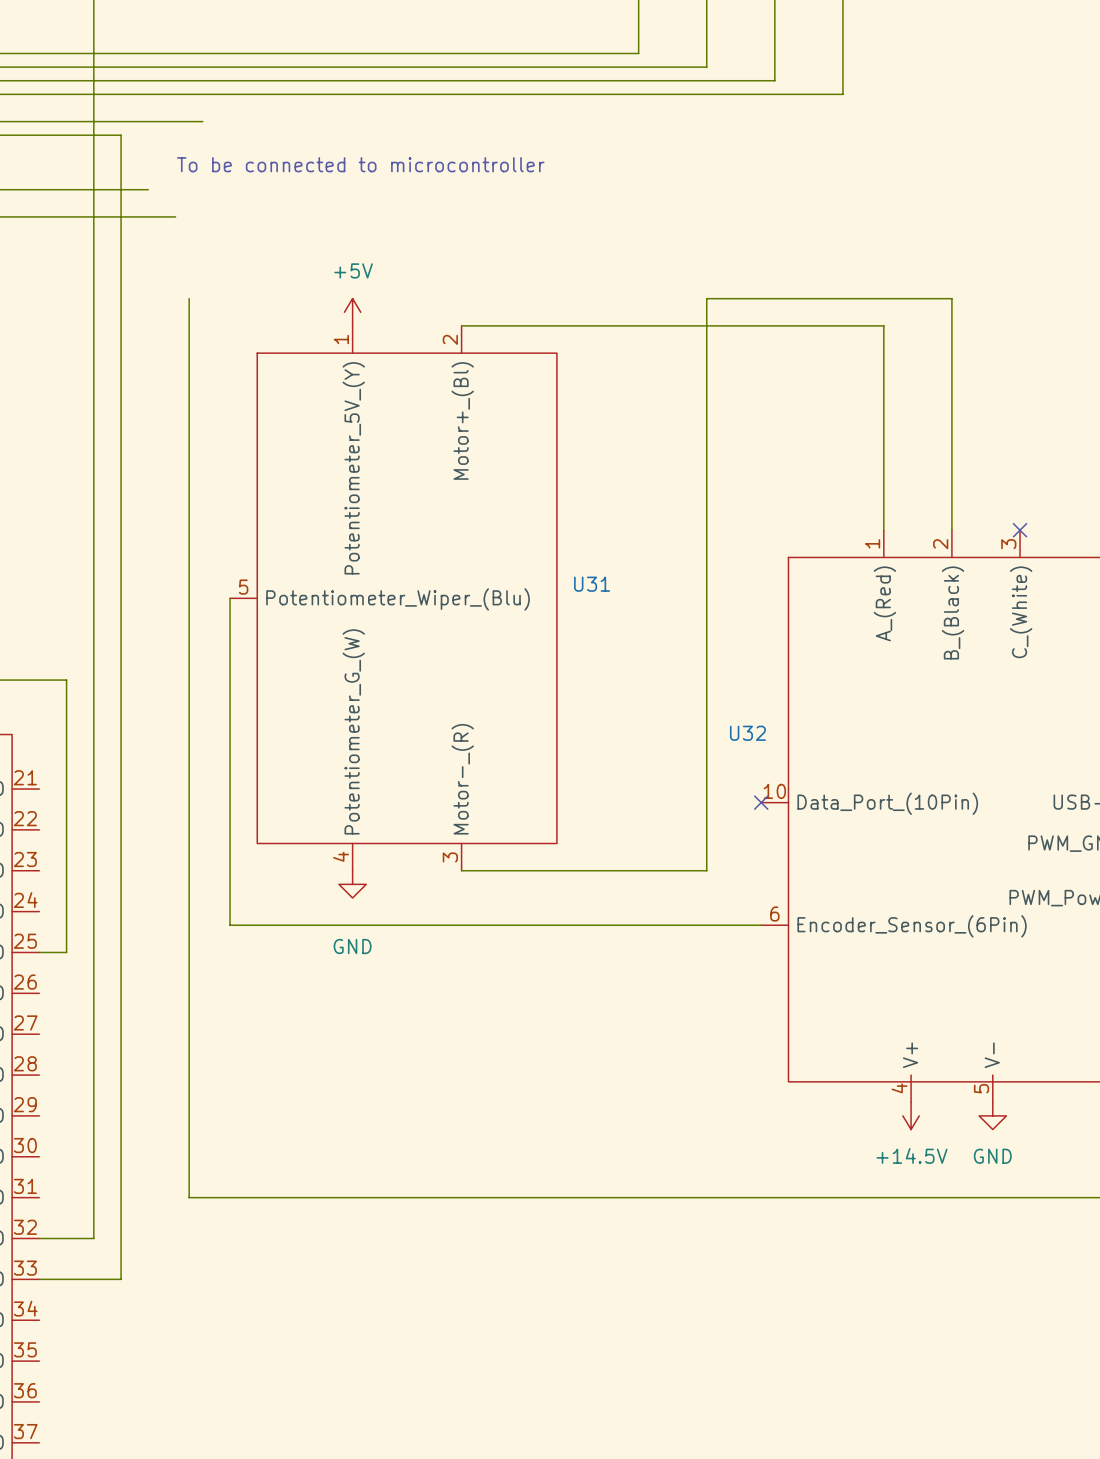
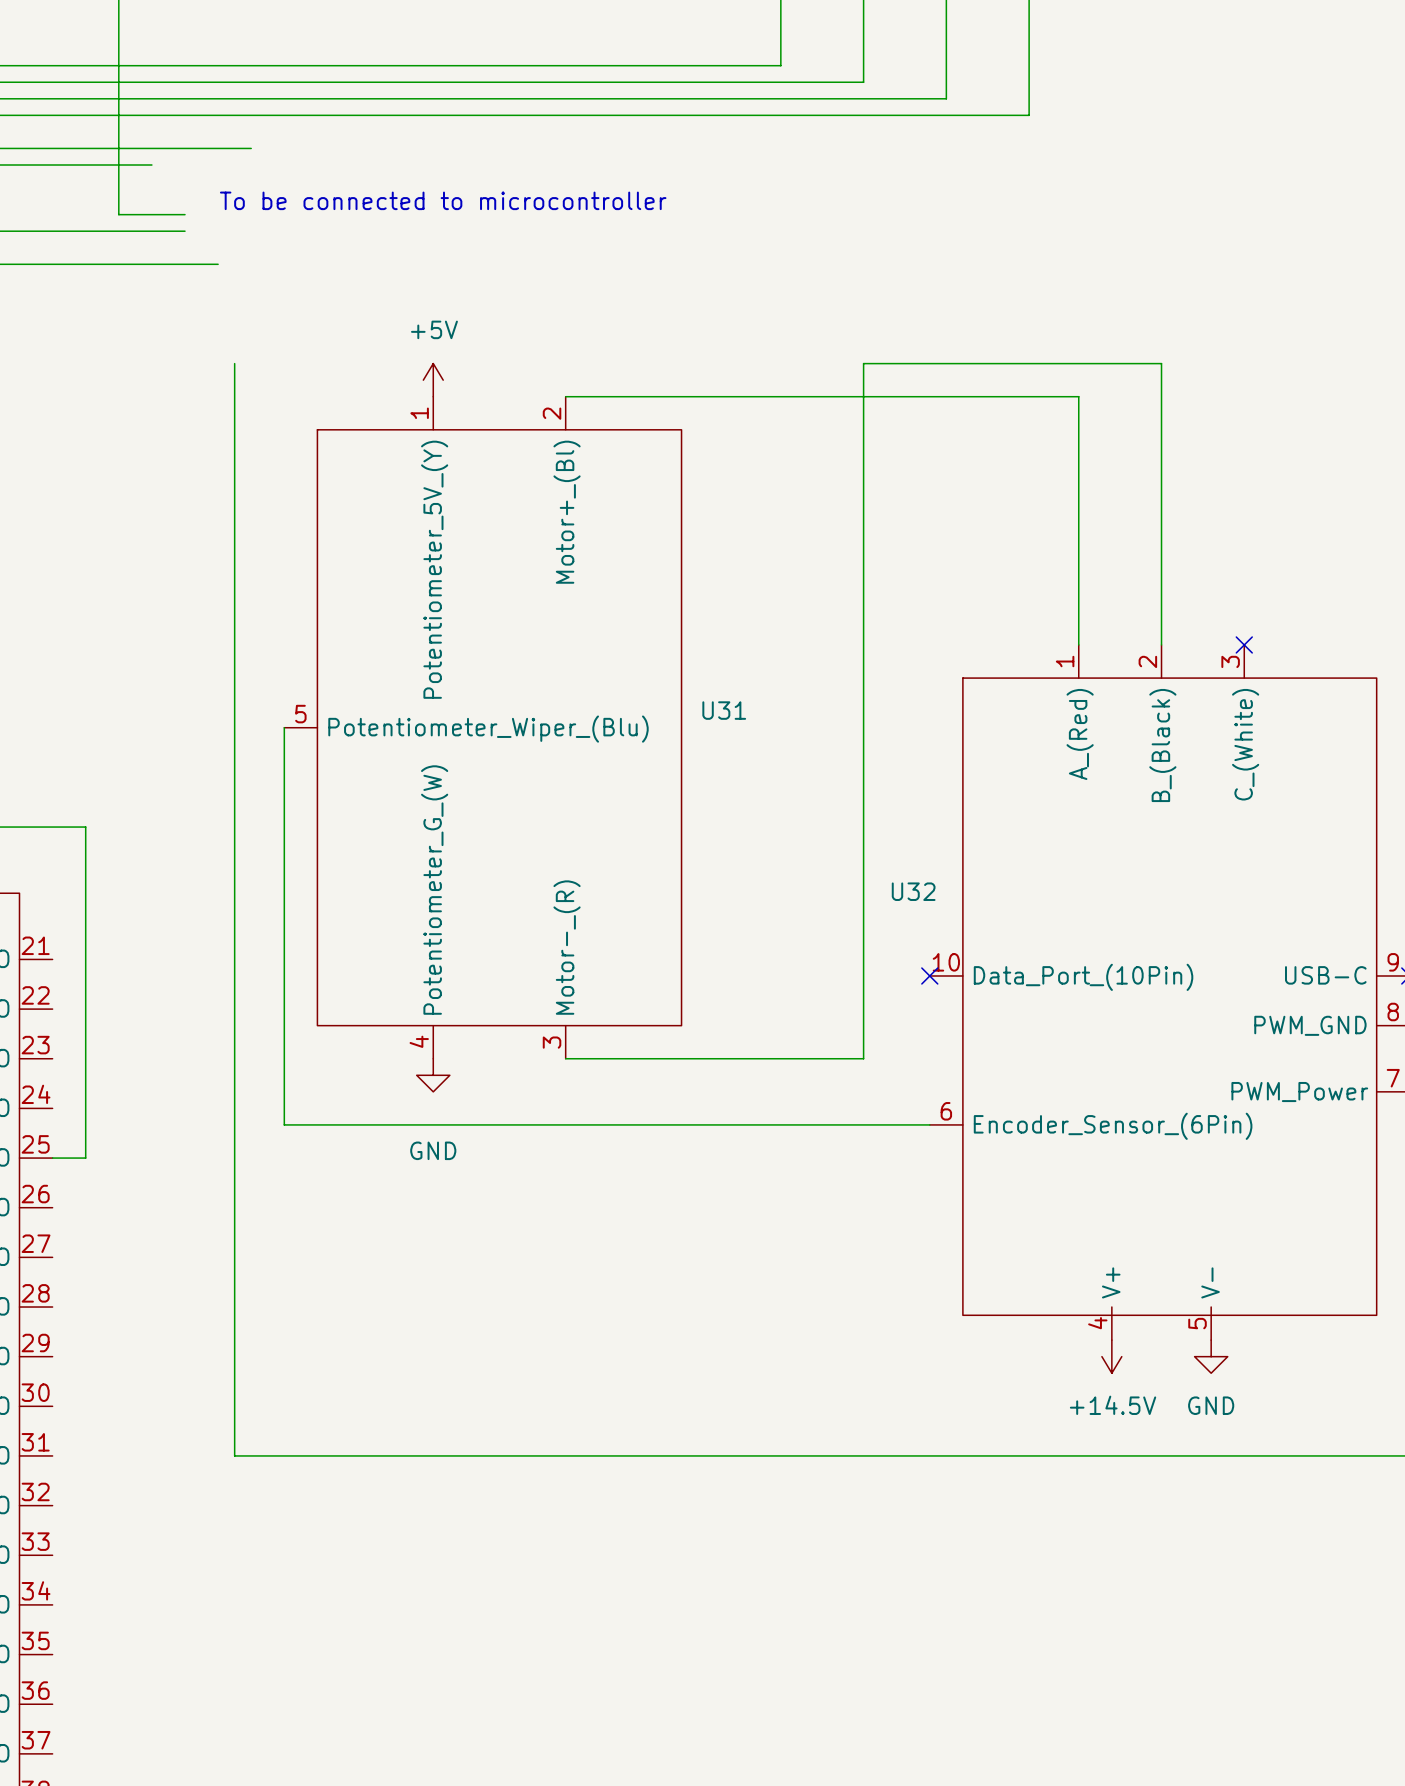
wire: (121, 135) (121, 1279) (39, 1279) -> none
wire: (93, 176) (93, 1238) (39, 1238) -> (118, 214) (185, 214)

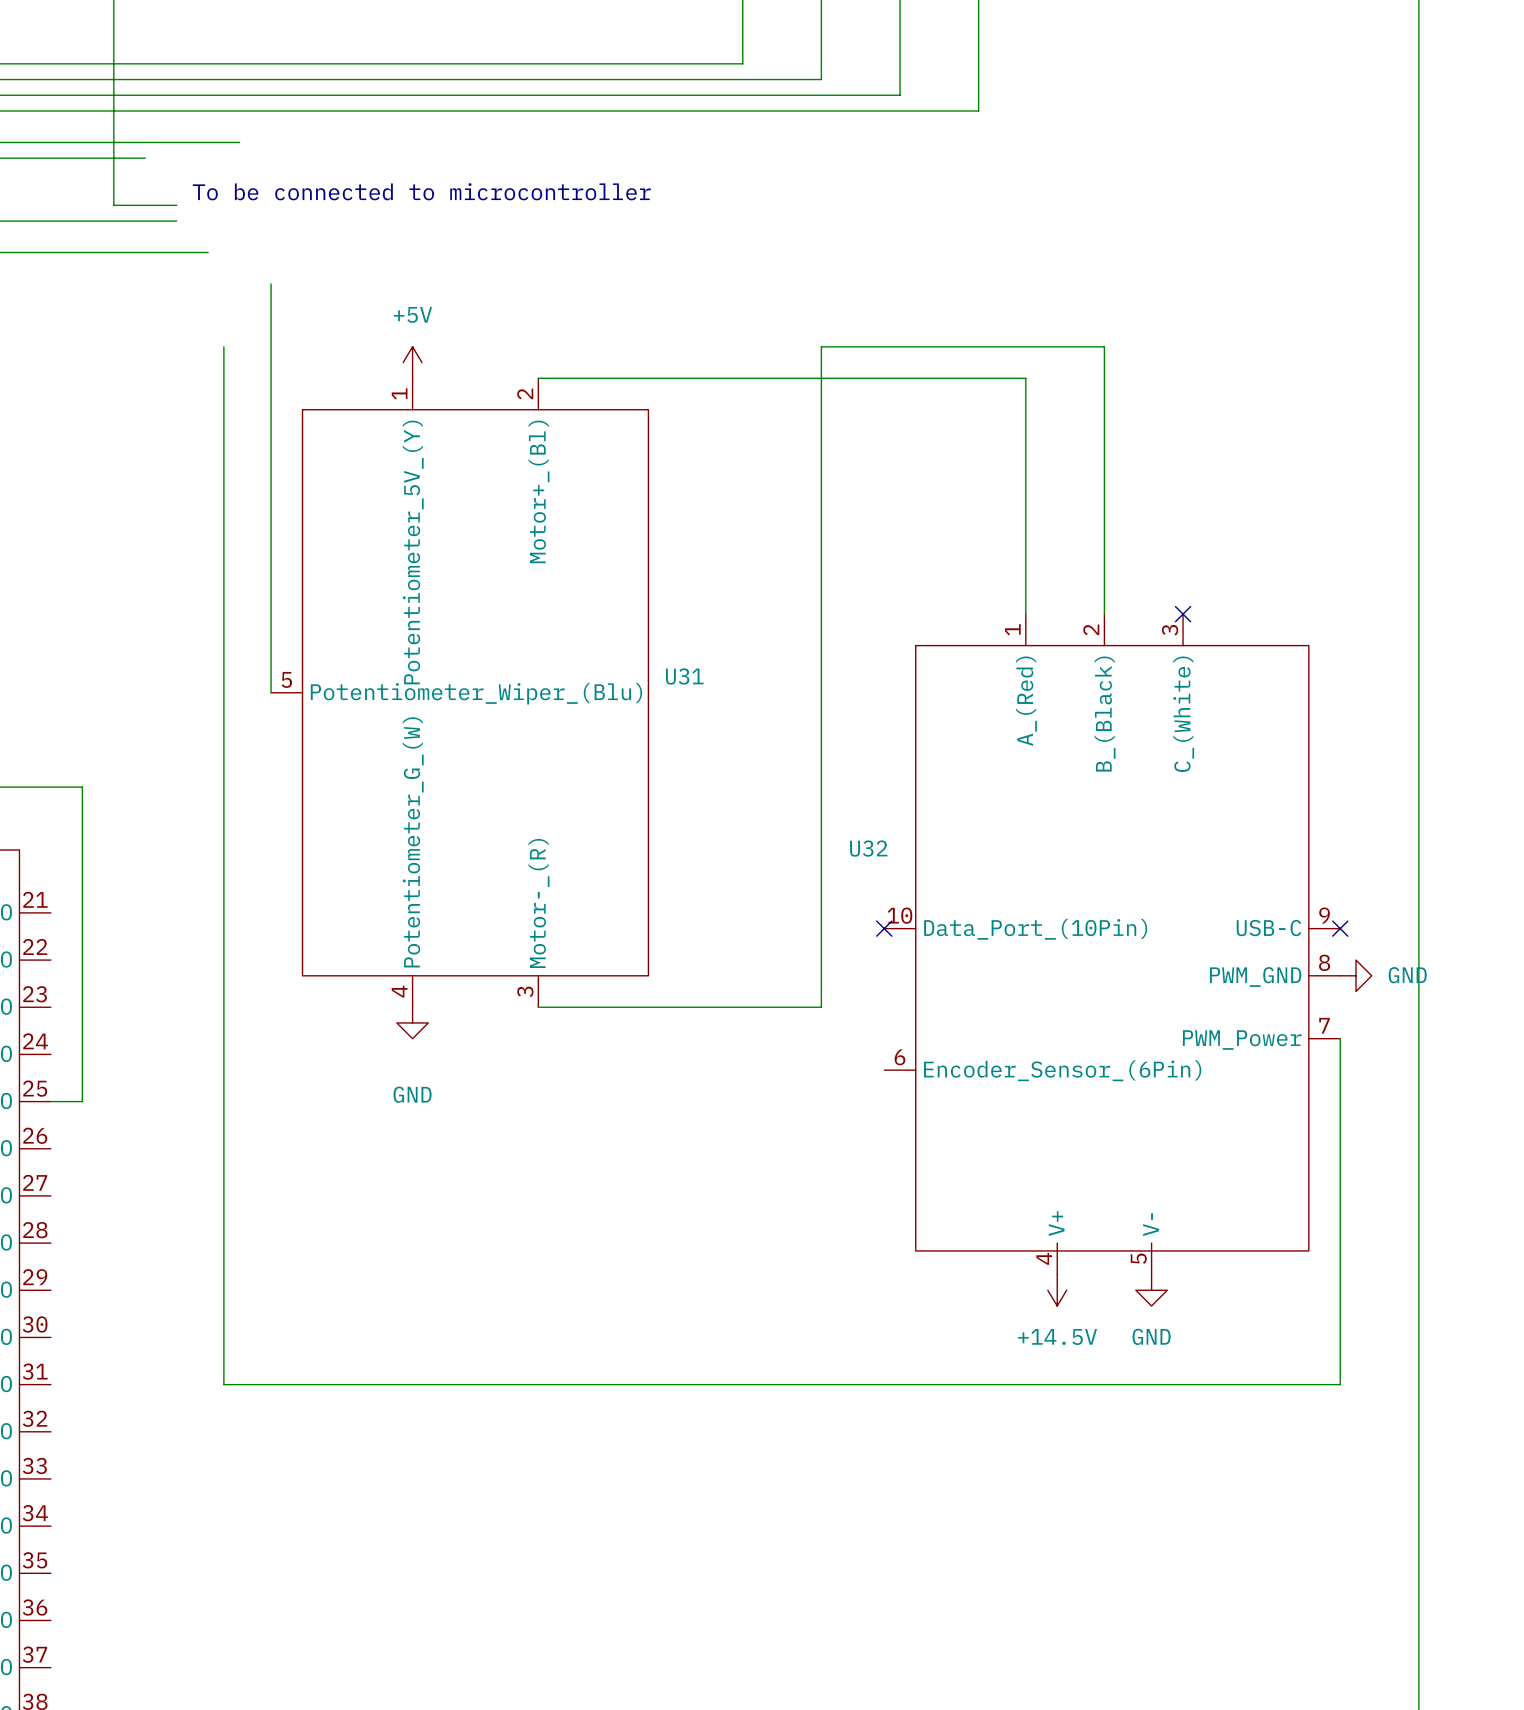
wire: (284, 727) (284, 1124) (929, 1124) -> (271, 692) (271, 283)

